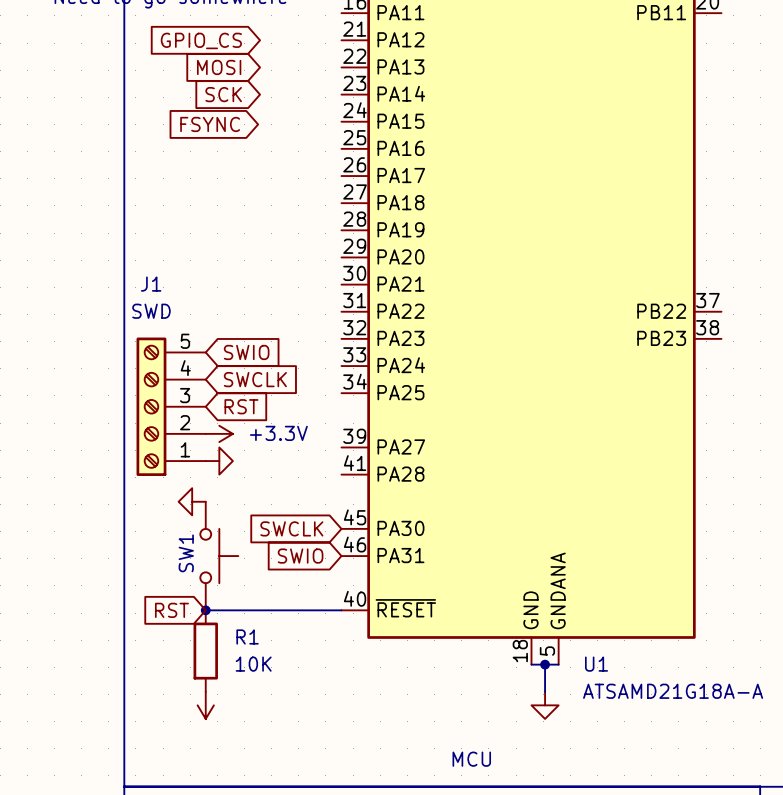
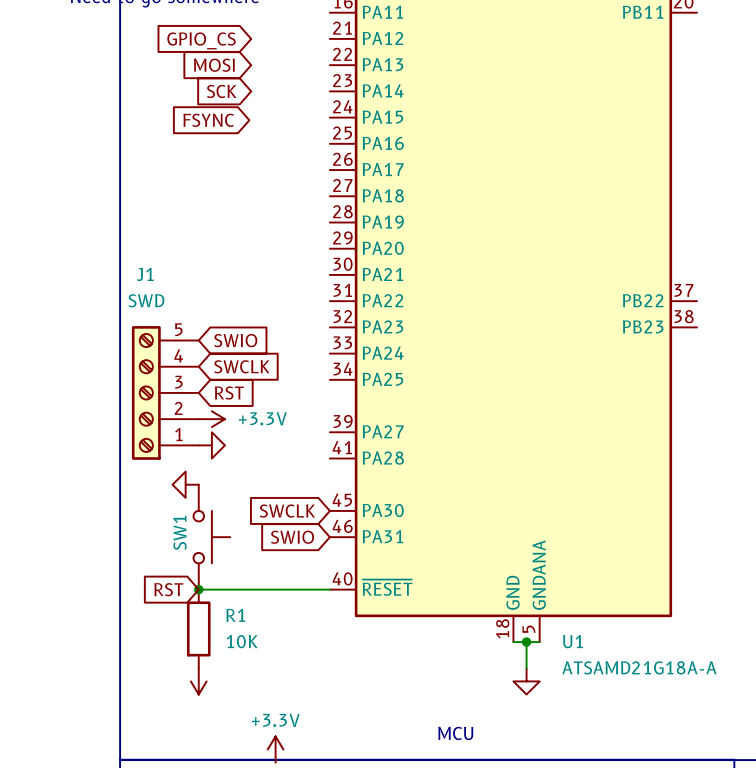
power symbol: none -> +3.3V (275, 749)

